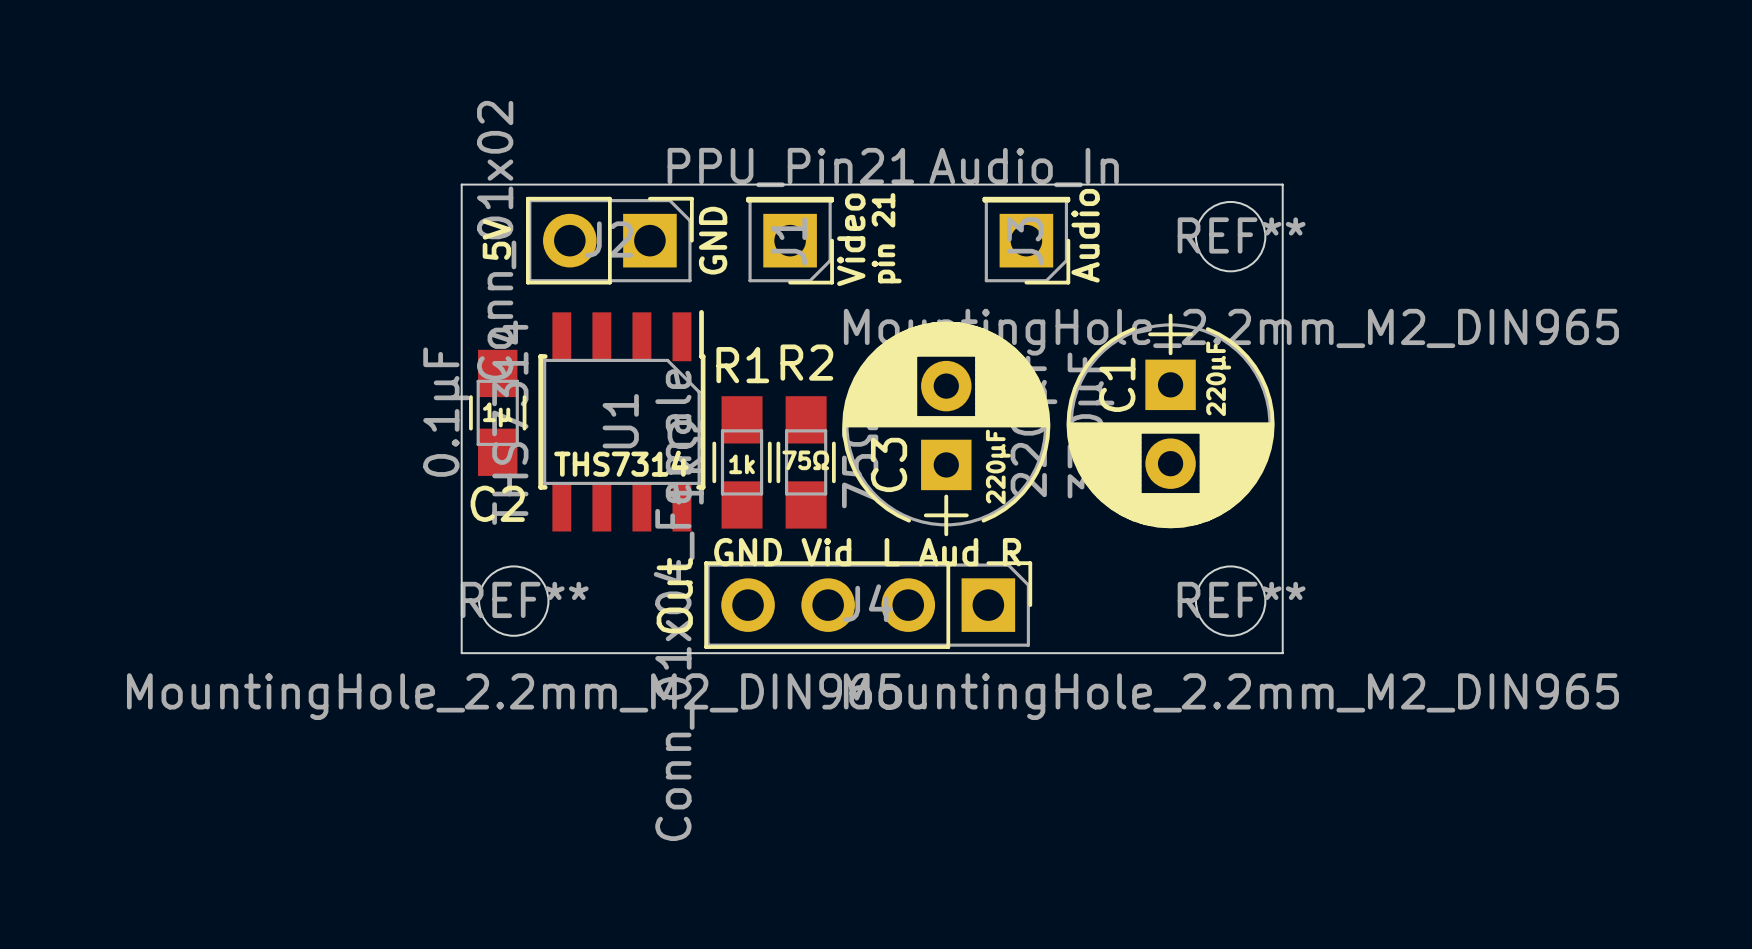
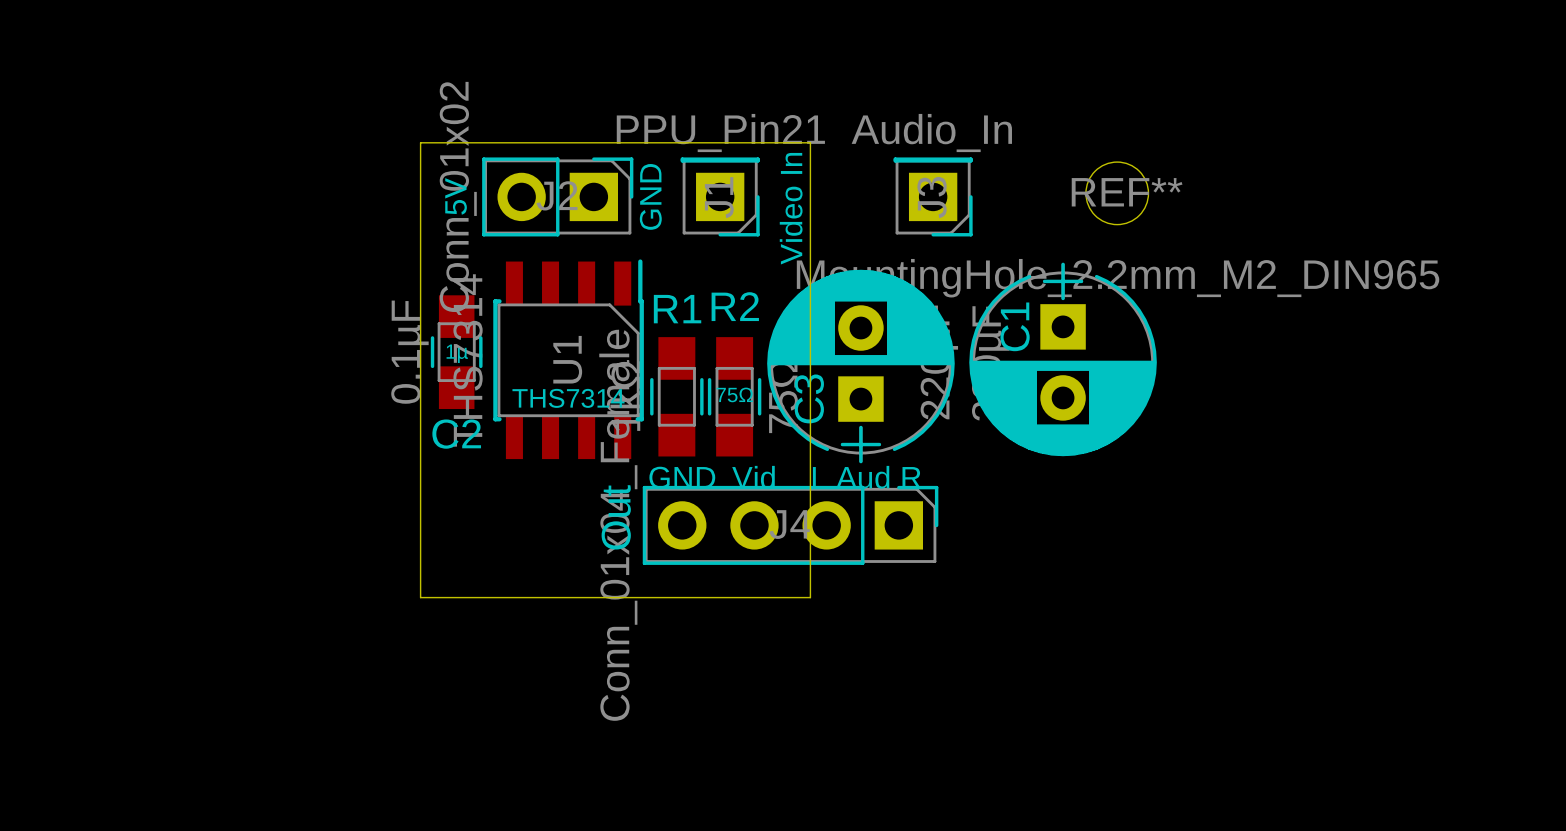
board edge: (461, 184) (1282, 184) (1282, 653) (461, 653) (461, 184) -> (420, 142) (420, 597) (810, 597) (810, 142) (420, 142)
text: Audio (1085, 235) -> none
text: pin 21 (886, 238) -> none
text: Video (851, 239) -> Video In (791, 208)
text: 220µF (1218, 378) -> none
text: 1k (742, 464) -> none
text: 220µF (998, 466) -> none
REF**: MountingHole_2.2mm_M2_DIN965 (513, 601) -> none
REF**: MountingHole_2.2mm_M2_DIN965 (1230, 601) -> none

